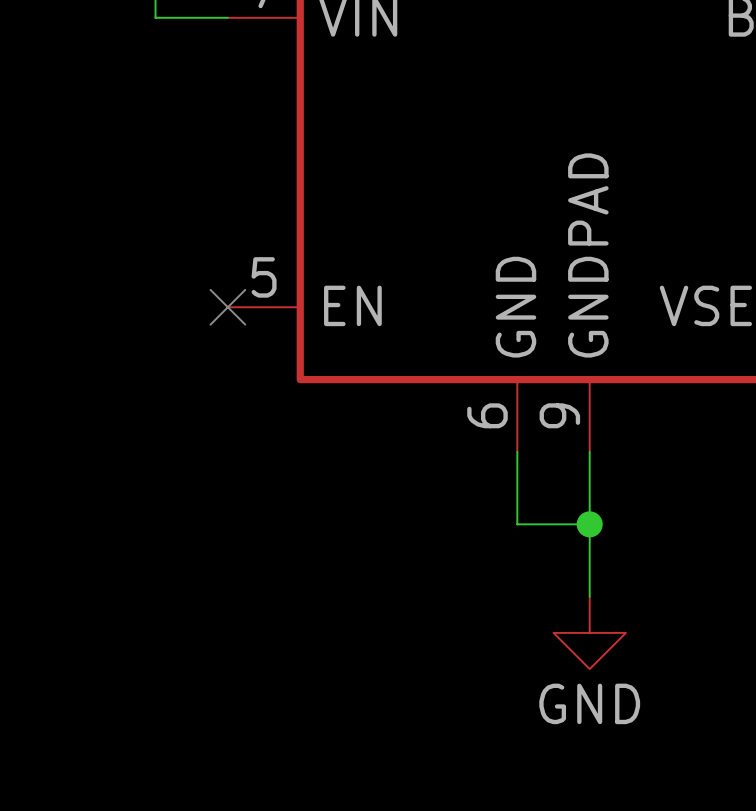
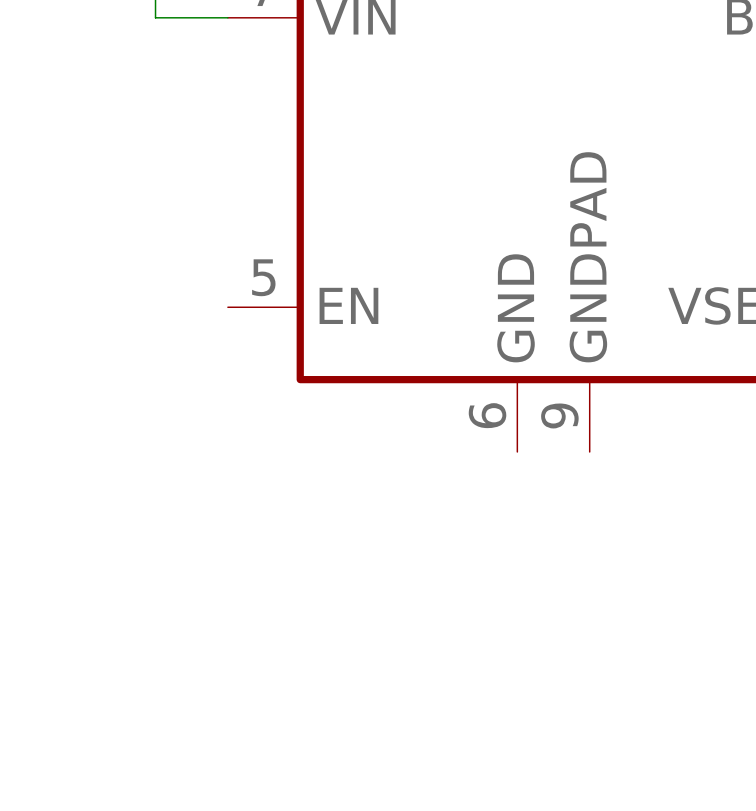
no-connect mark: (227, 307) -> none
wire: (517, 451) (517, 524) (589, 524) -> none
wire: (589, 451) (589, 596) -> none
junction: (589, 524) -> none
power symbol: GND (589, 632) -> none

